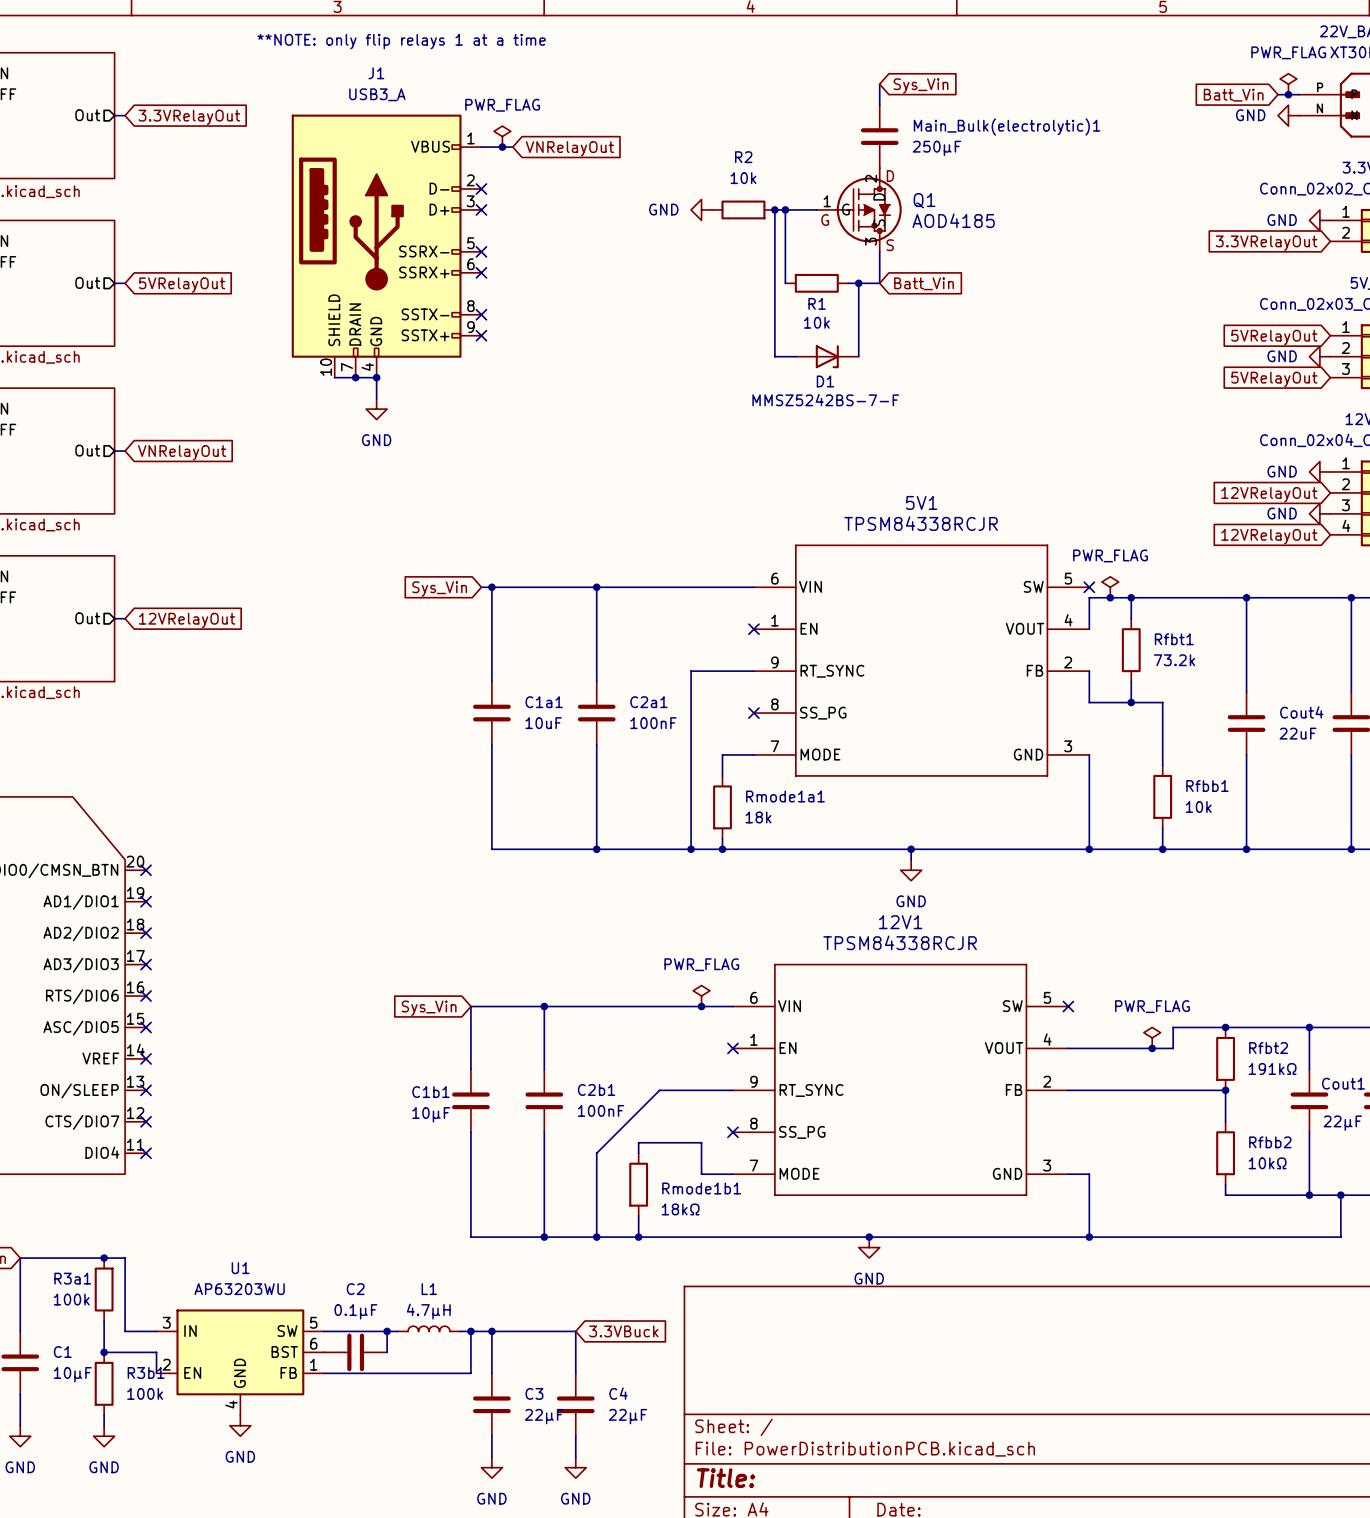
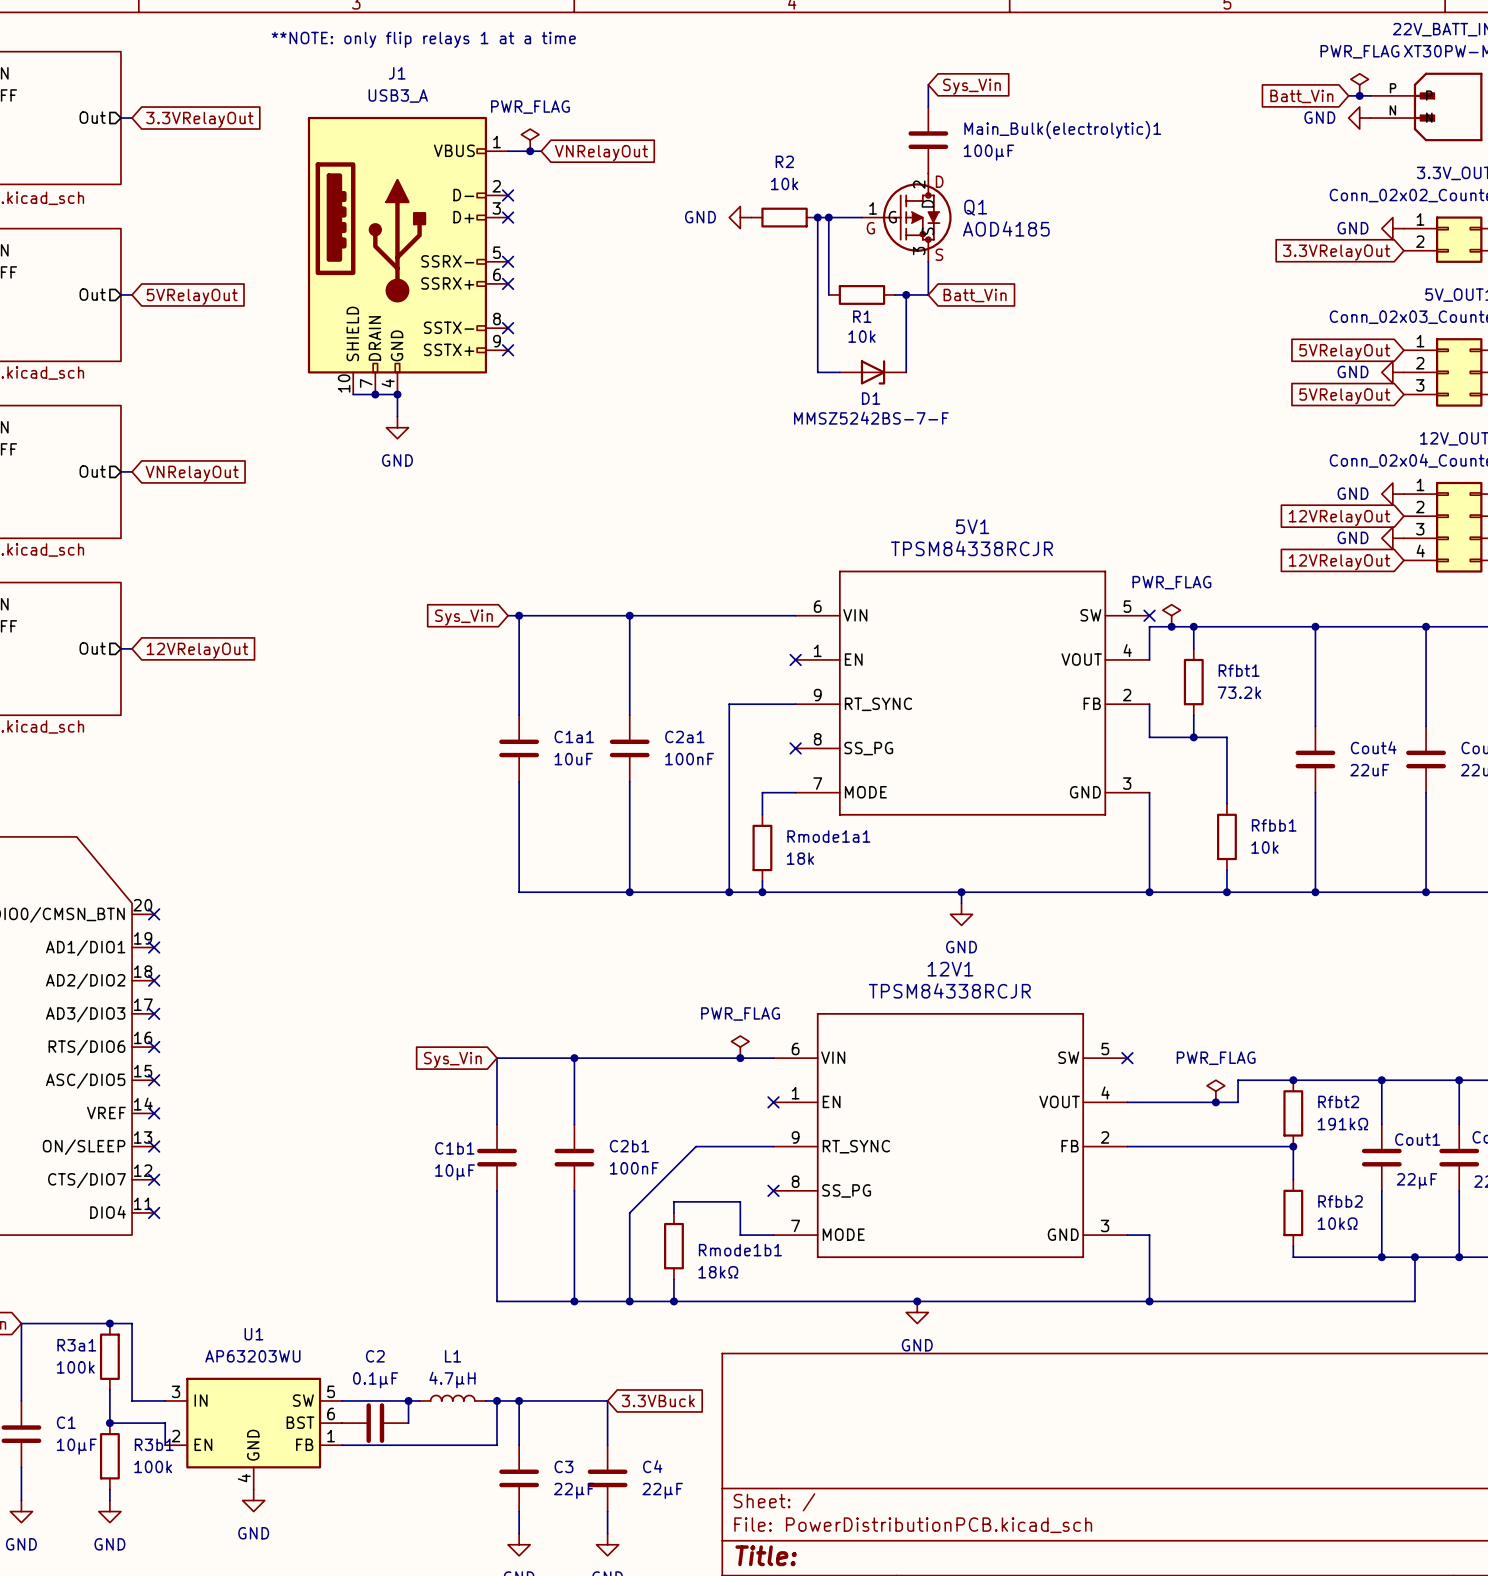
Main_Bulk(electrolytic)1 value: 250µF (936, 148) -> 100µF (988, 152)

